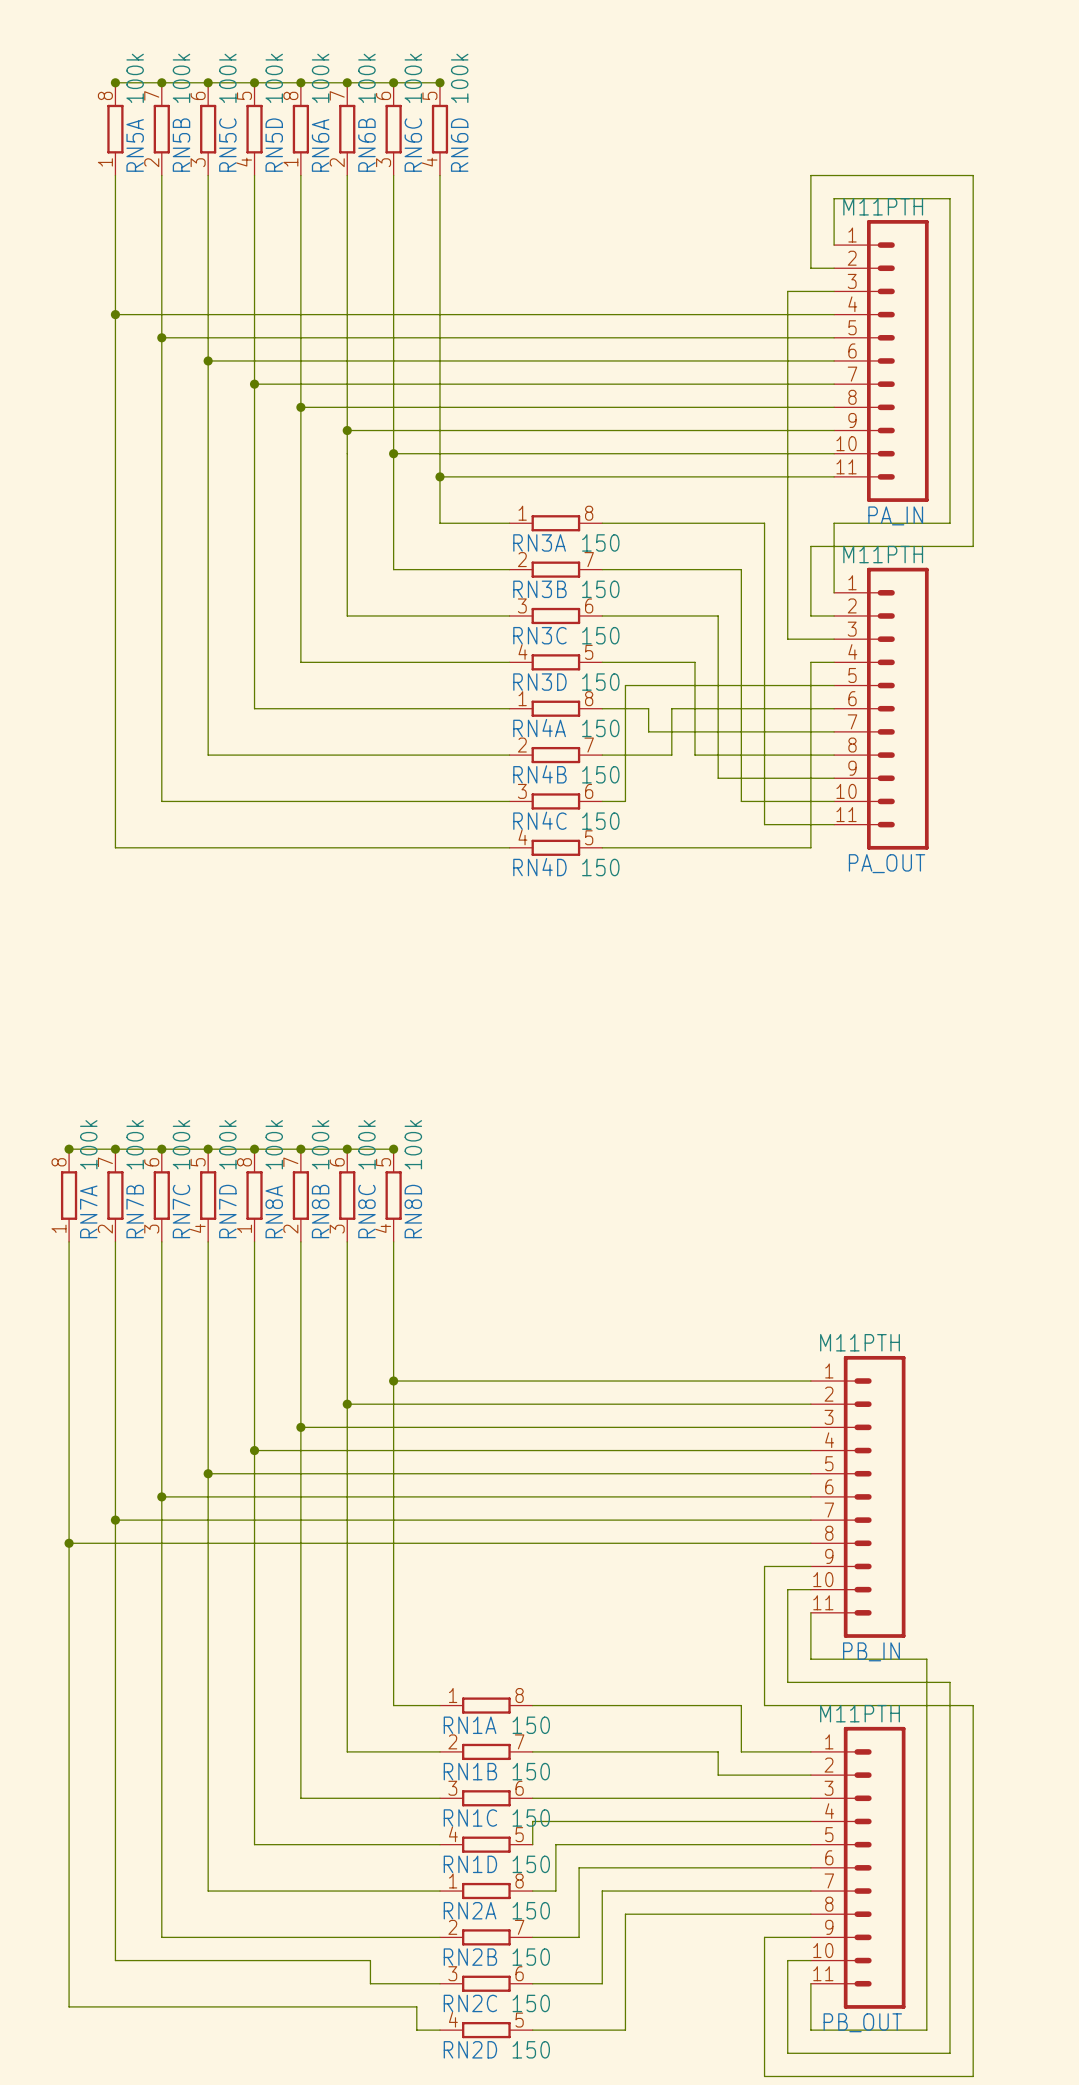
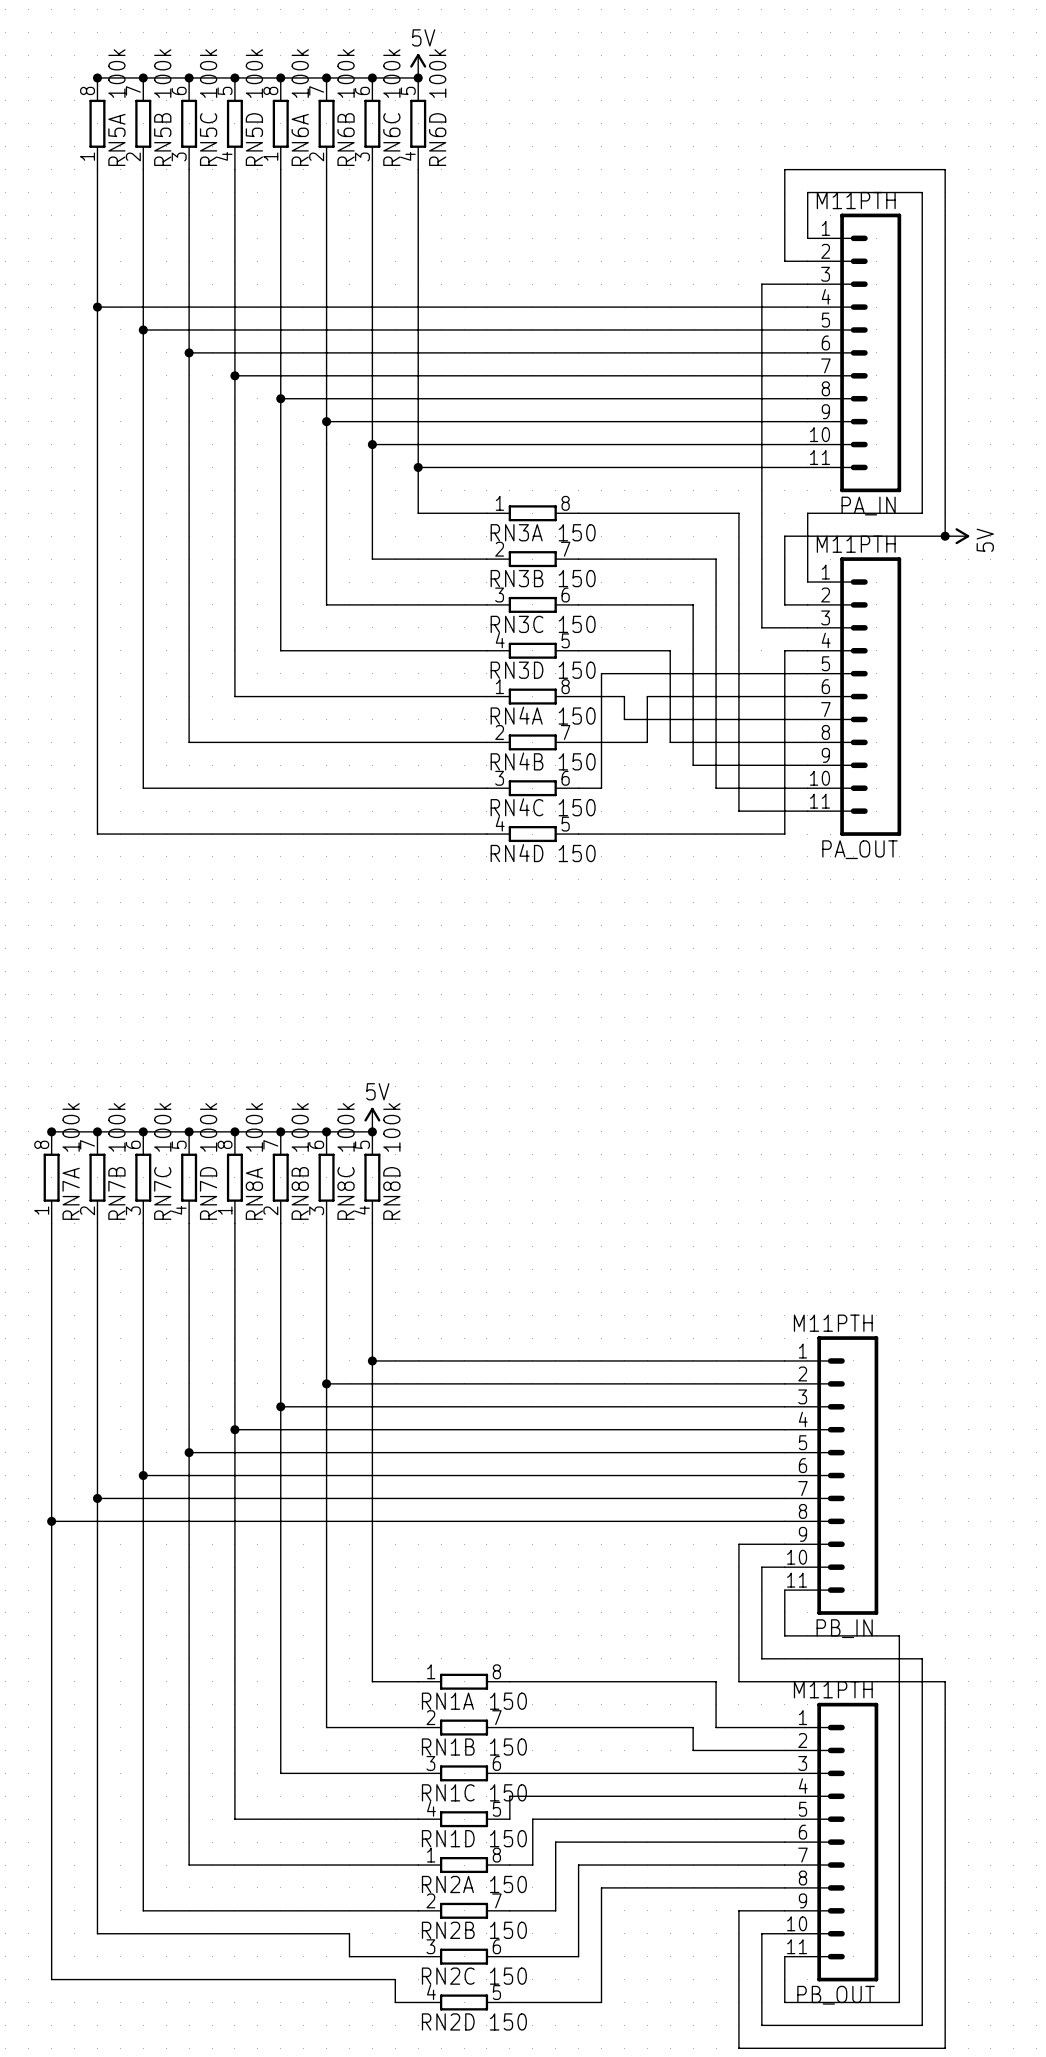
power symbol: none -> 5V (418, 65)
junction: none -> (945, 536)
power symbol: none -> 5V (957, 536)
power symbol: none -> 5V (372, 1119)

